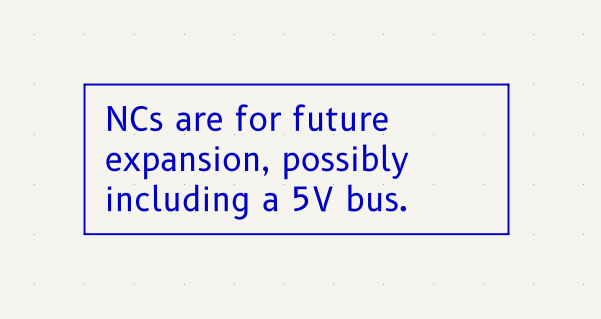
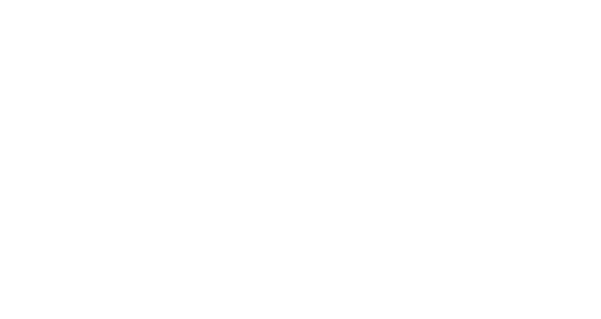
line: (84, 84) (508, 84) (508, 234) (84, 234) (84, 84) -> none
text: NCs are for future (247, 117) -> none
text: expansion, possibly (257, 161) -> none
text: including a 5V bus. (256, 202) -> none

